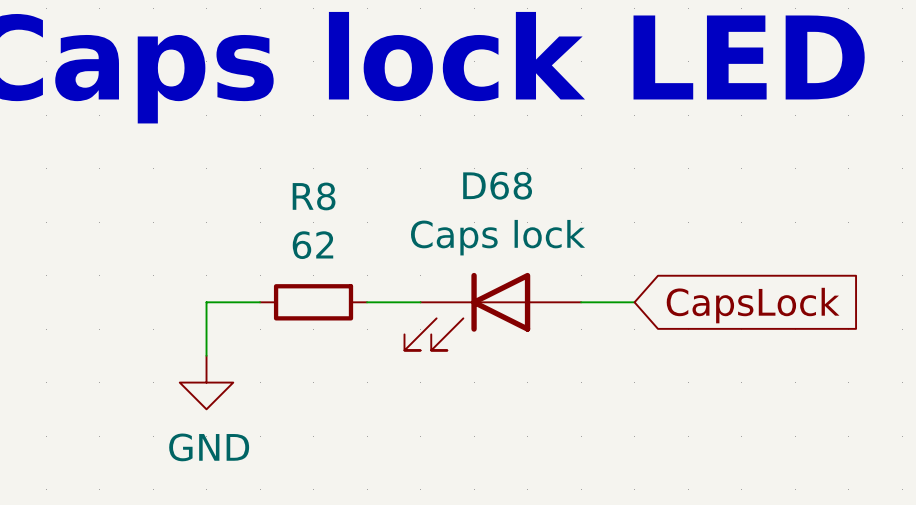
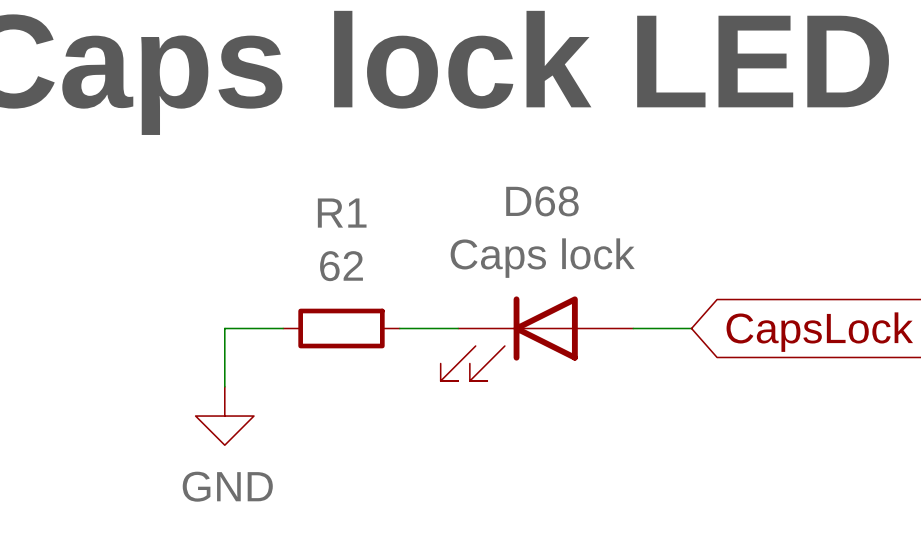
R8 name: R8 (314, 196) -> R1 (342, 213)

